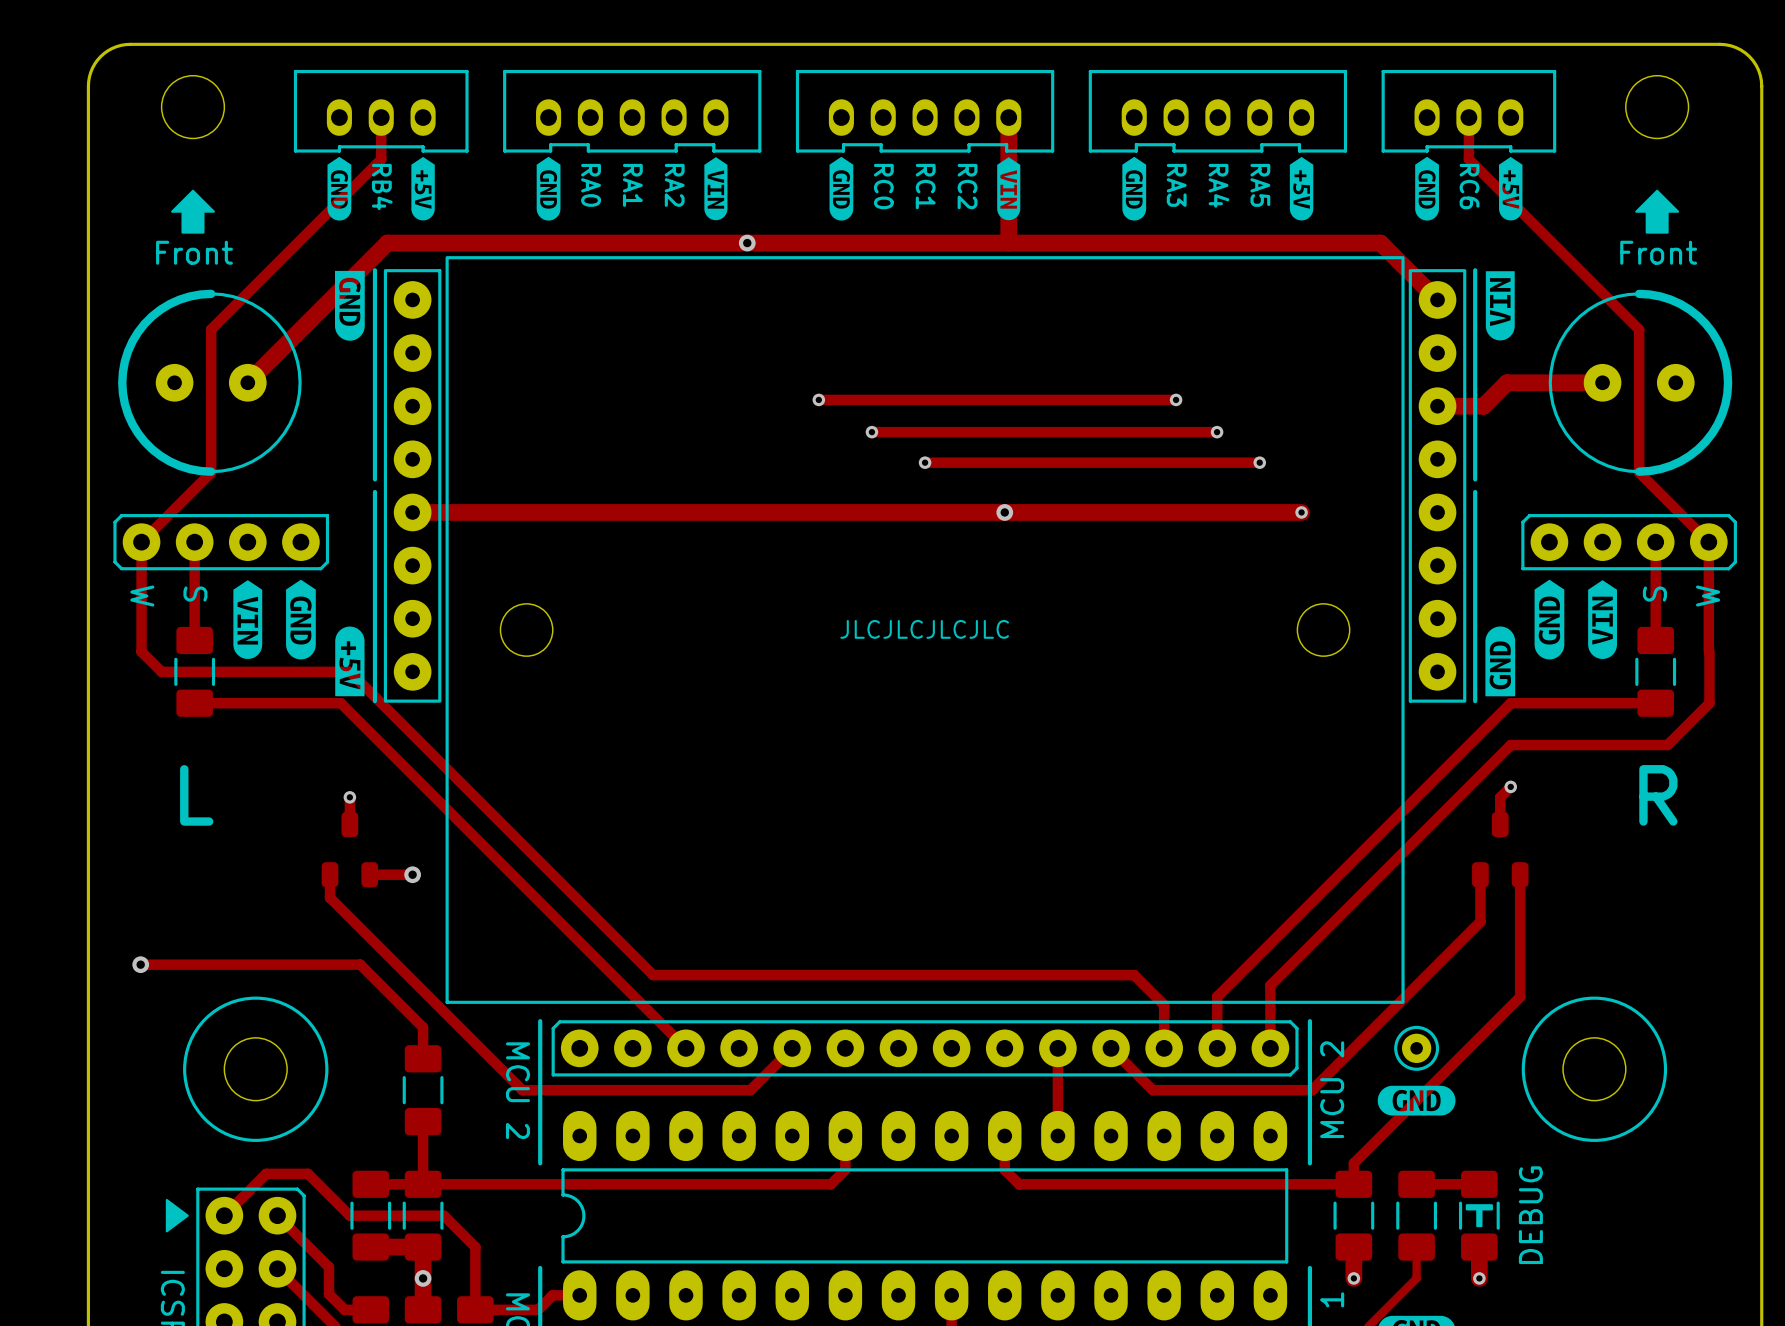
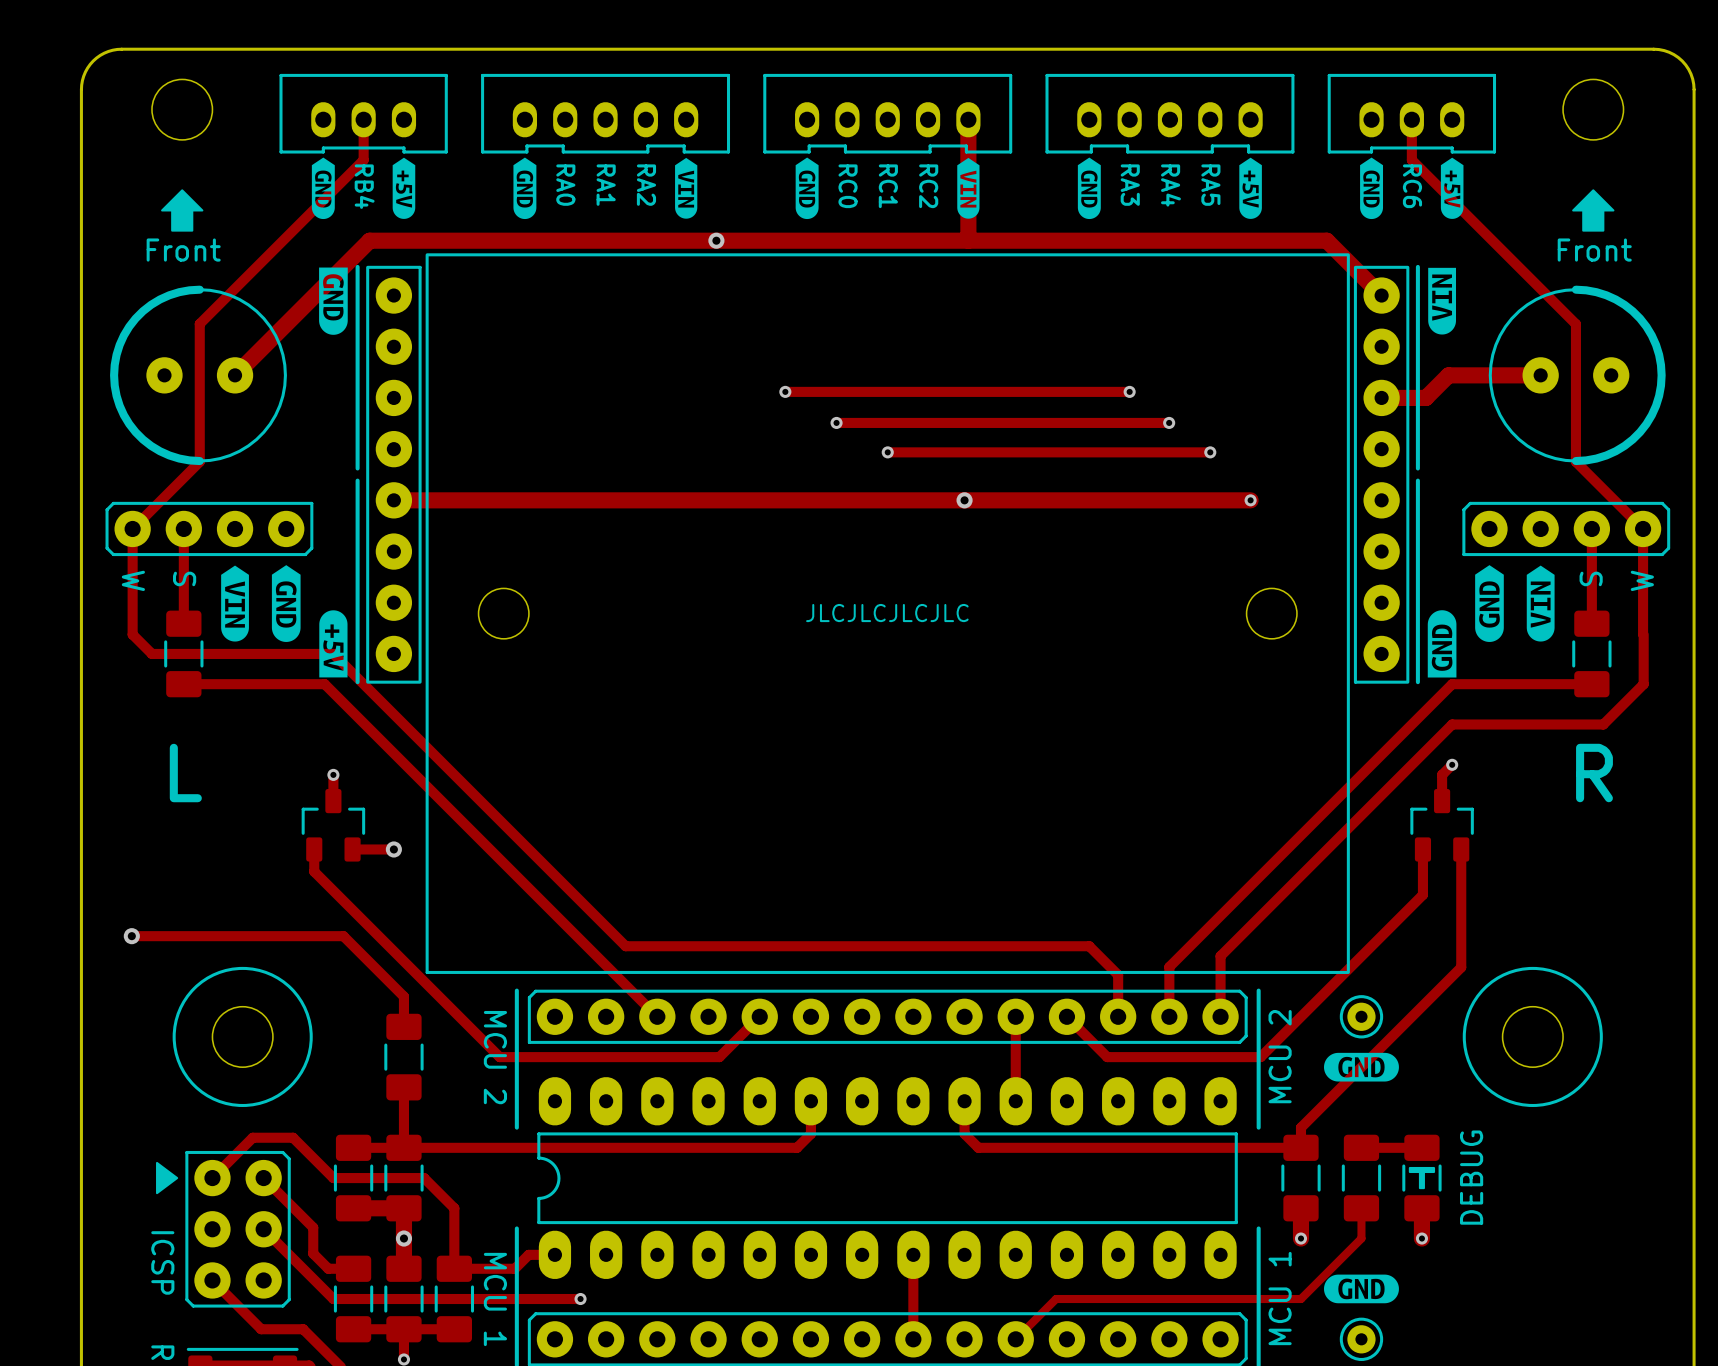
part footprint: [321, 811, 379, 888] -> [301, 789, 366, 862]
part footprint: [1472, 811, 1529, 888] -> [1410, 789, 1474, 862]

